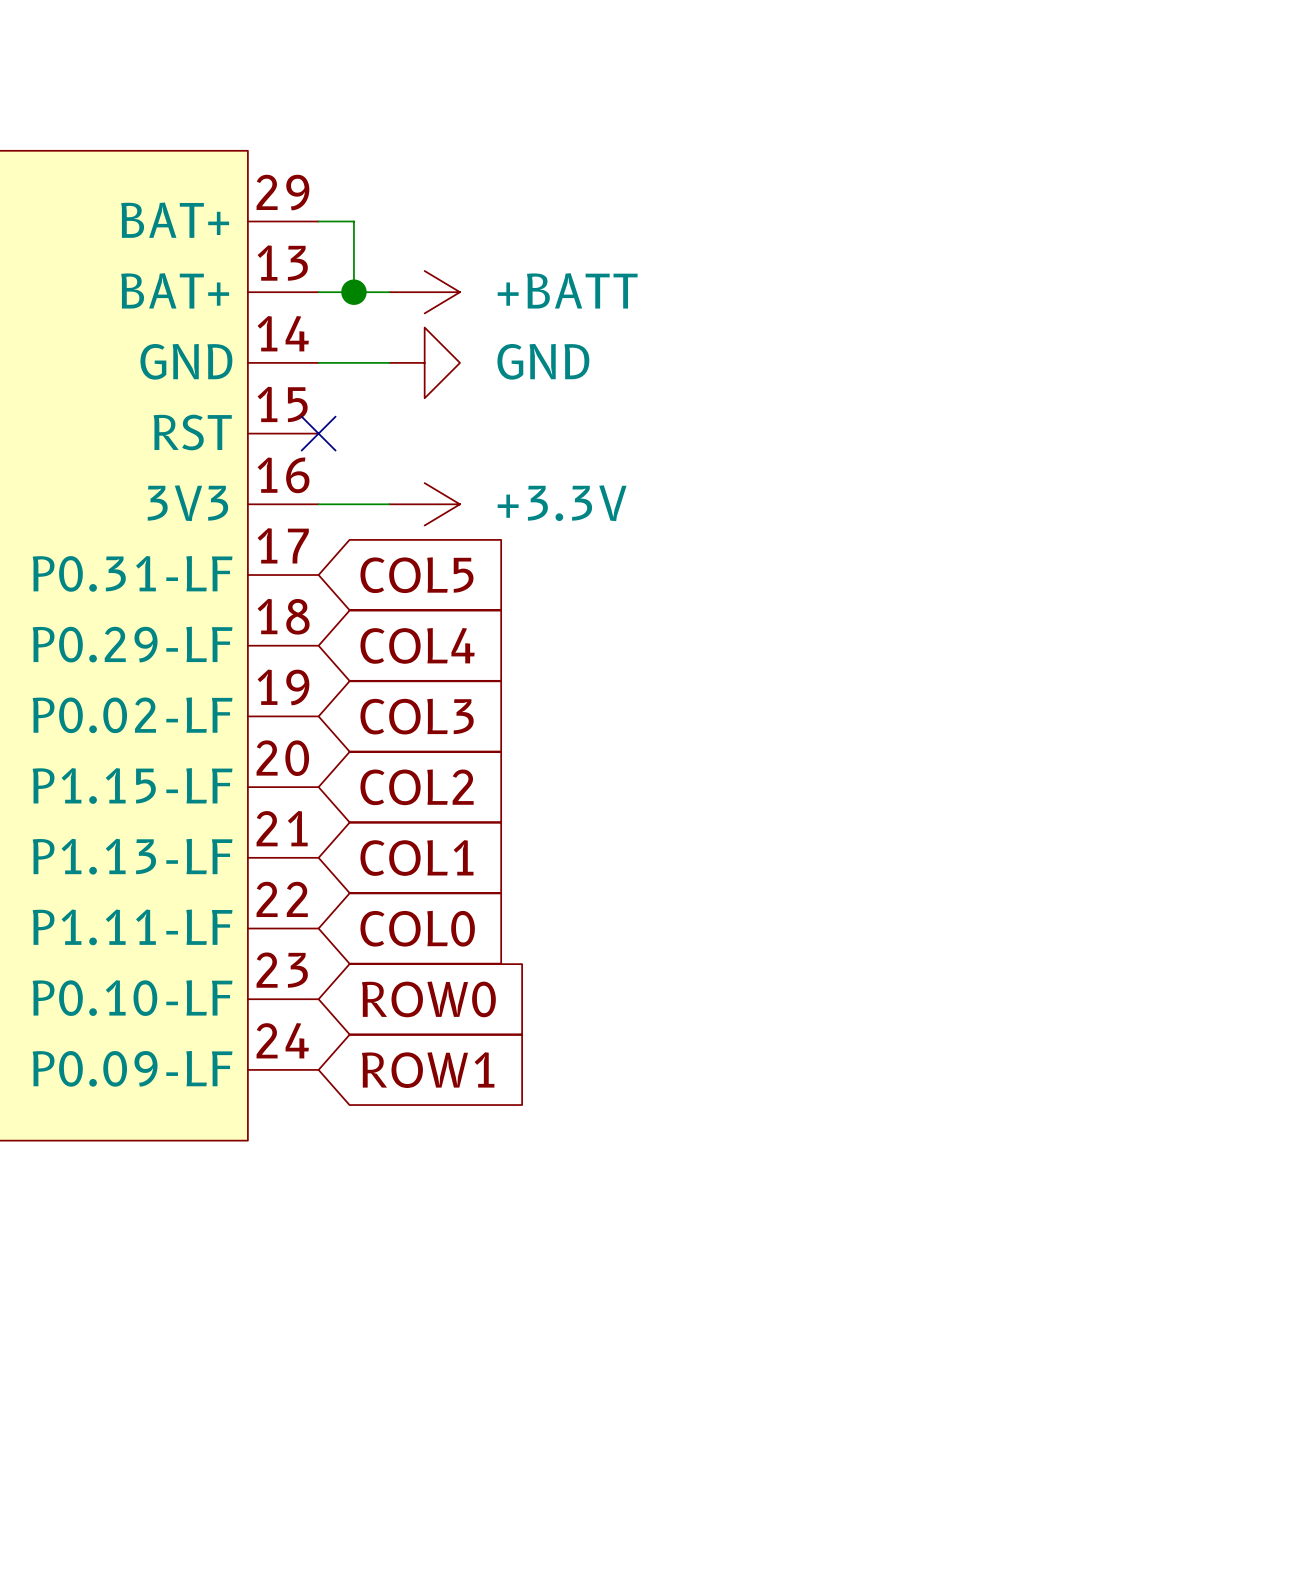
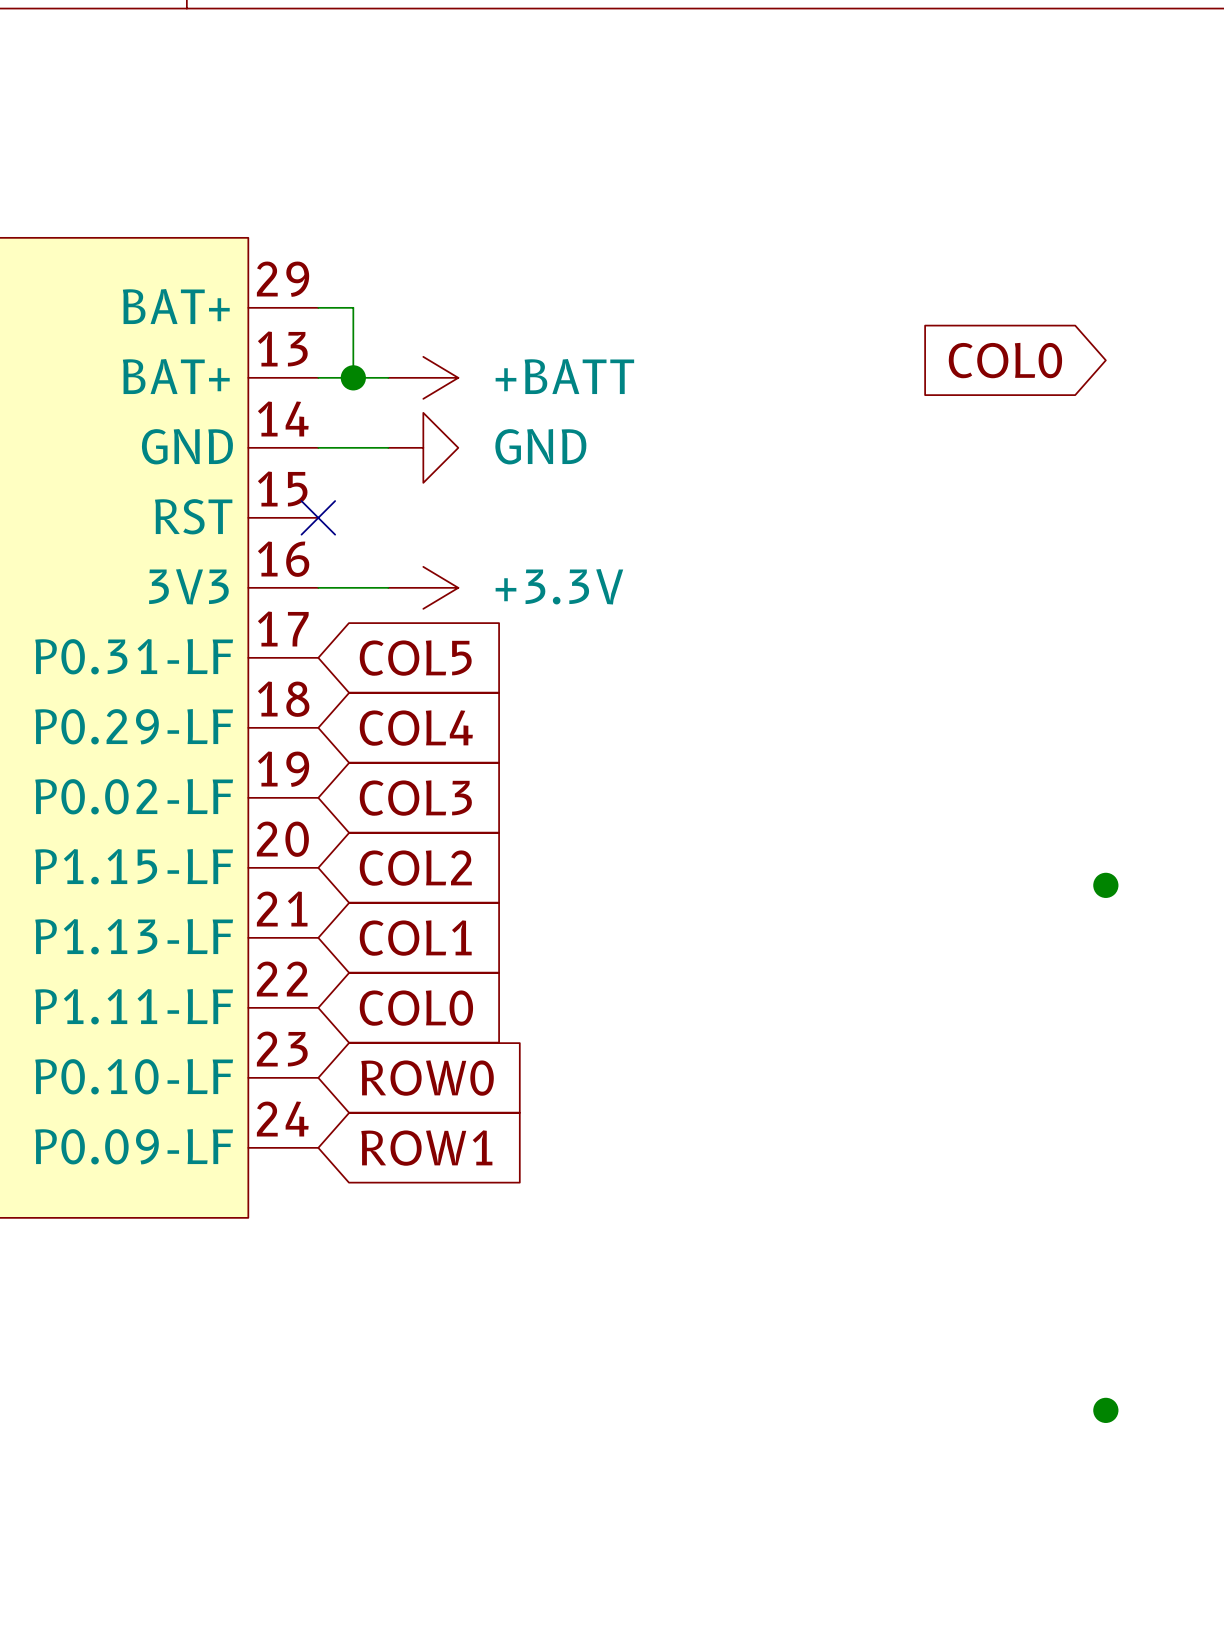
global label: none -> COL0 (1005, 360)
junction: none -> (1105, 885)
junction: none -> (1105, 1410)

